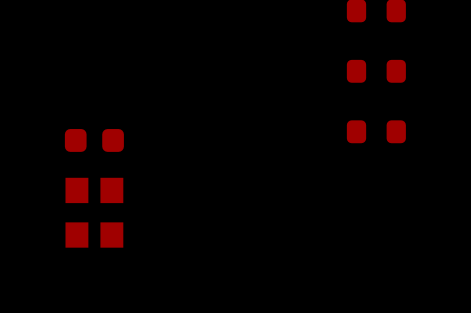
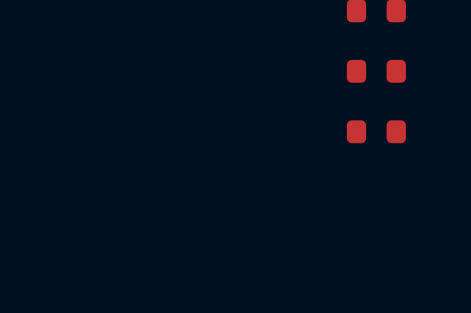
part: (94, 140) -> none
part: (94, 212) -> none

